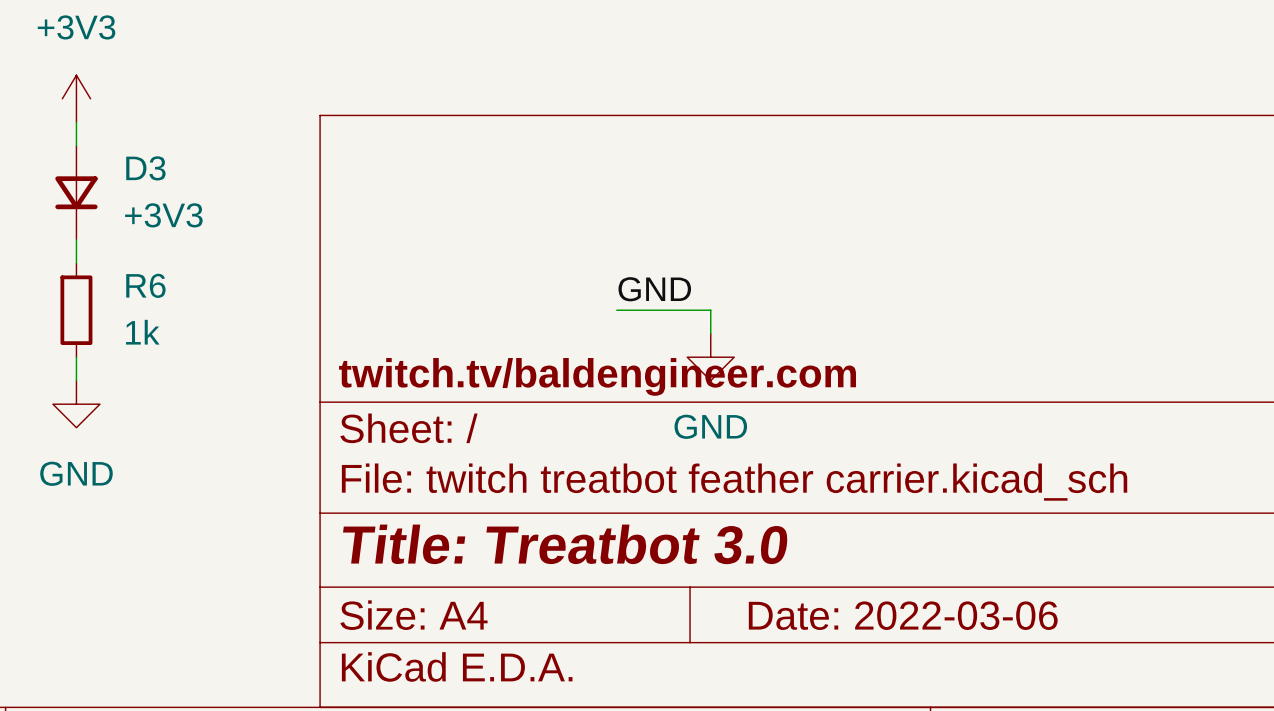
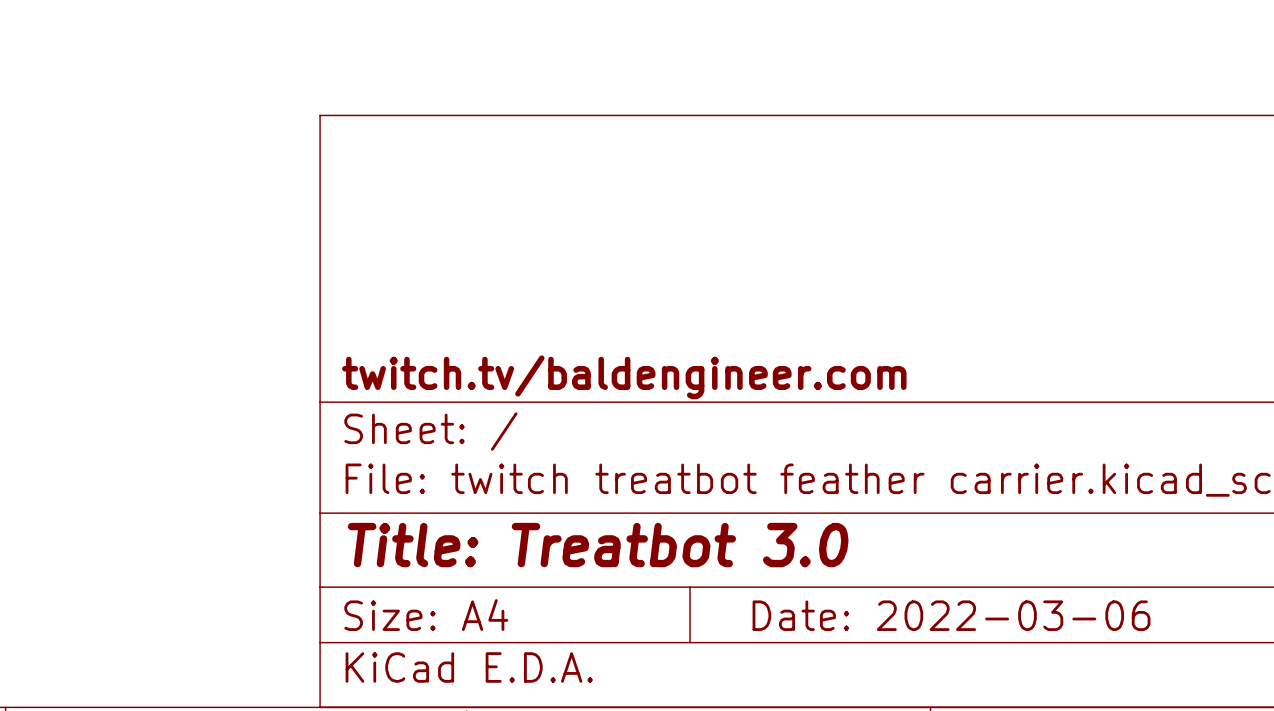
power symbol: +3V3 (76, 98) -> none
wire: (76, 122) (76, 145) -> none
D3: +3V3 (76, 192) -> none
wire: (76, 239) (76, 263) -> none
label: GND (654, 289) -> none
R6: 1k (76, 310) -> none
wire: (616, 310) (710, 310) (710, 333) -> none
wire: (76, 357) (76, 380) -> none
power symbol: GND (710, 357) -> none
power symbol: GND (76, 404) -> none

